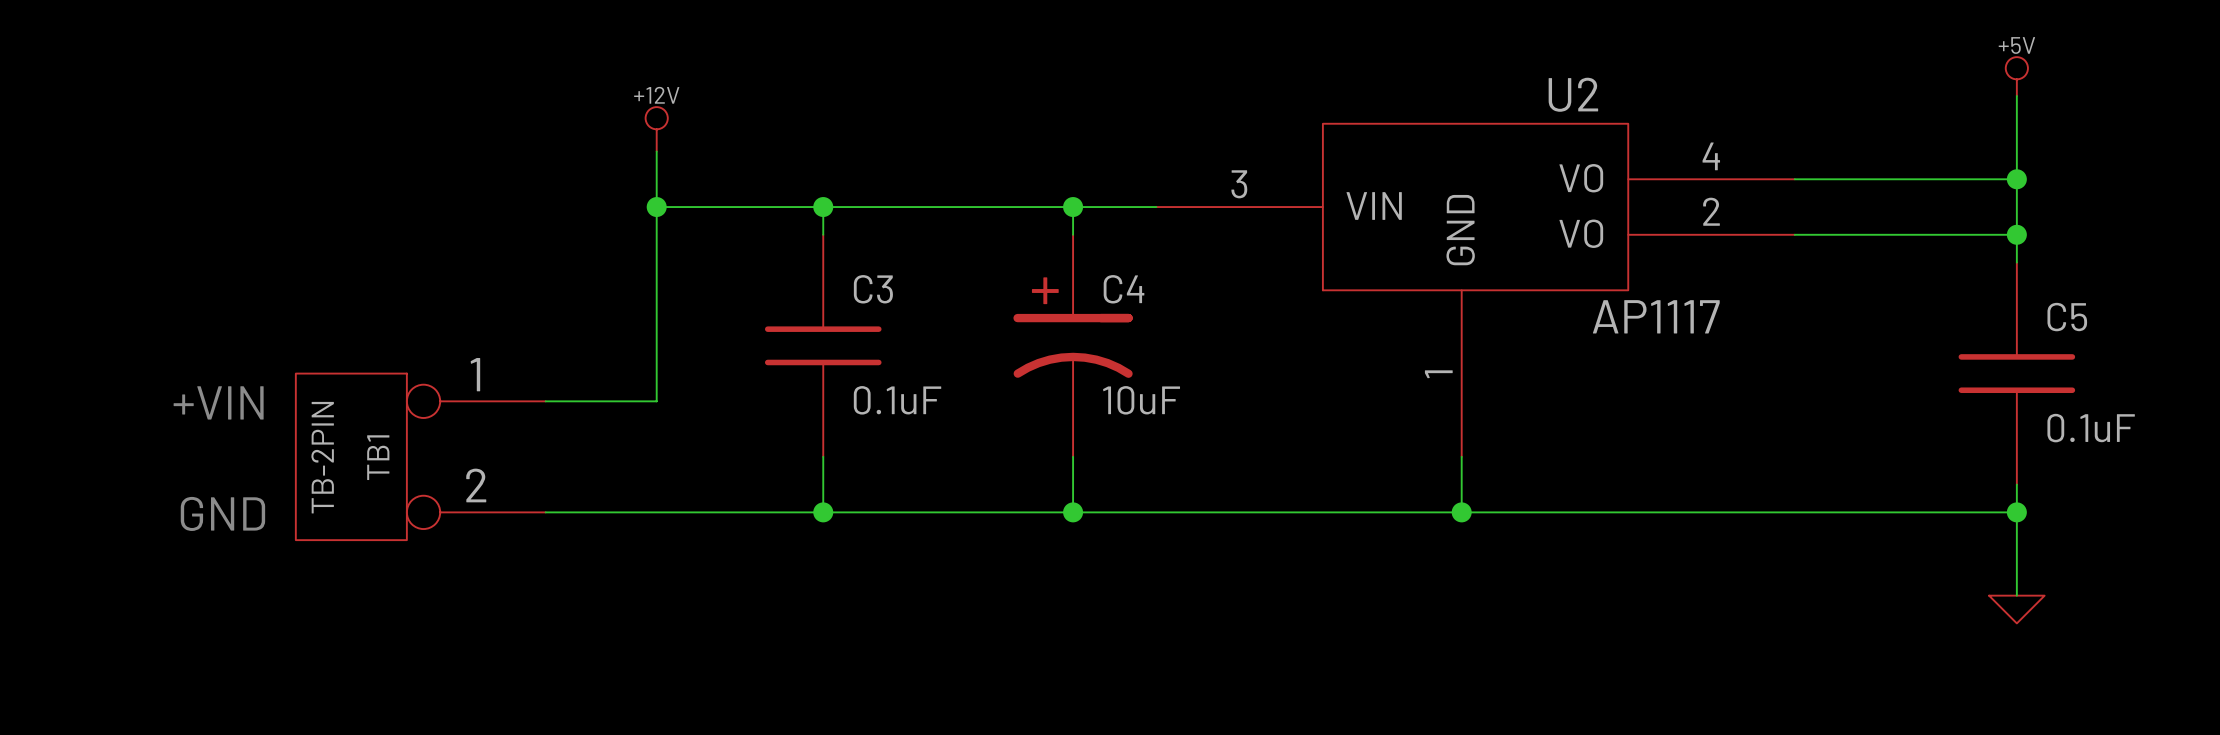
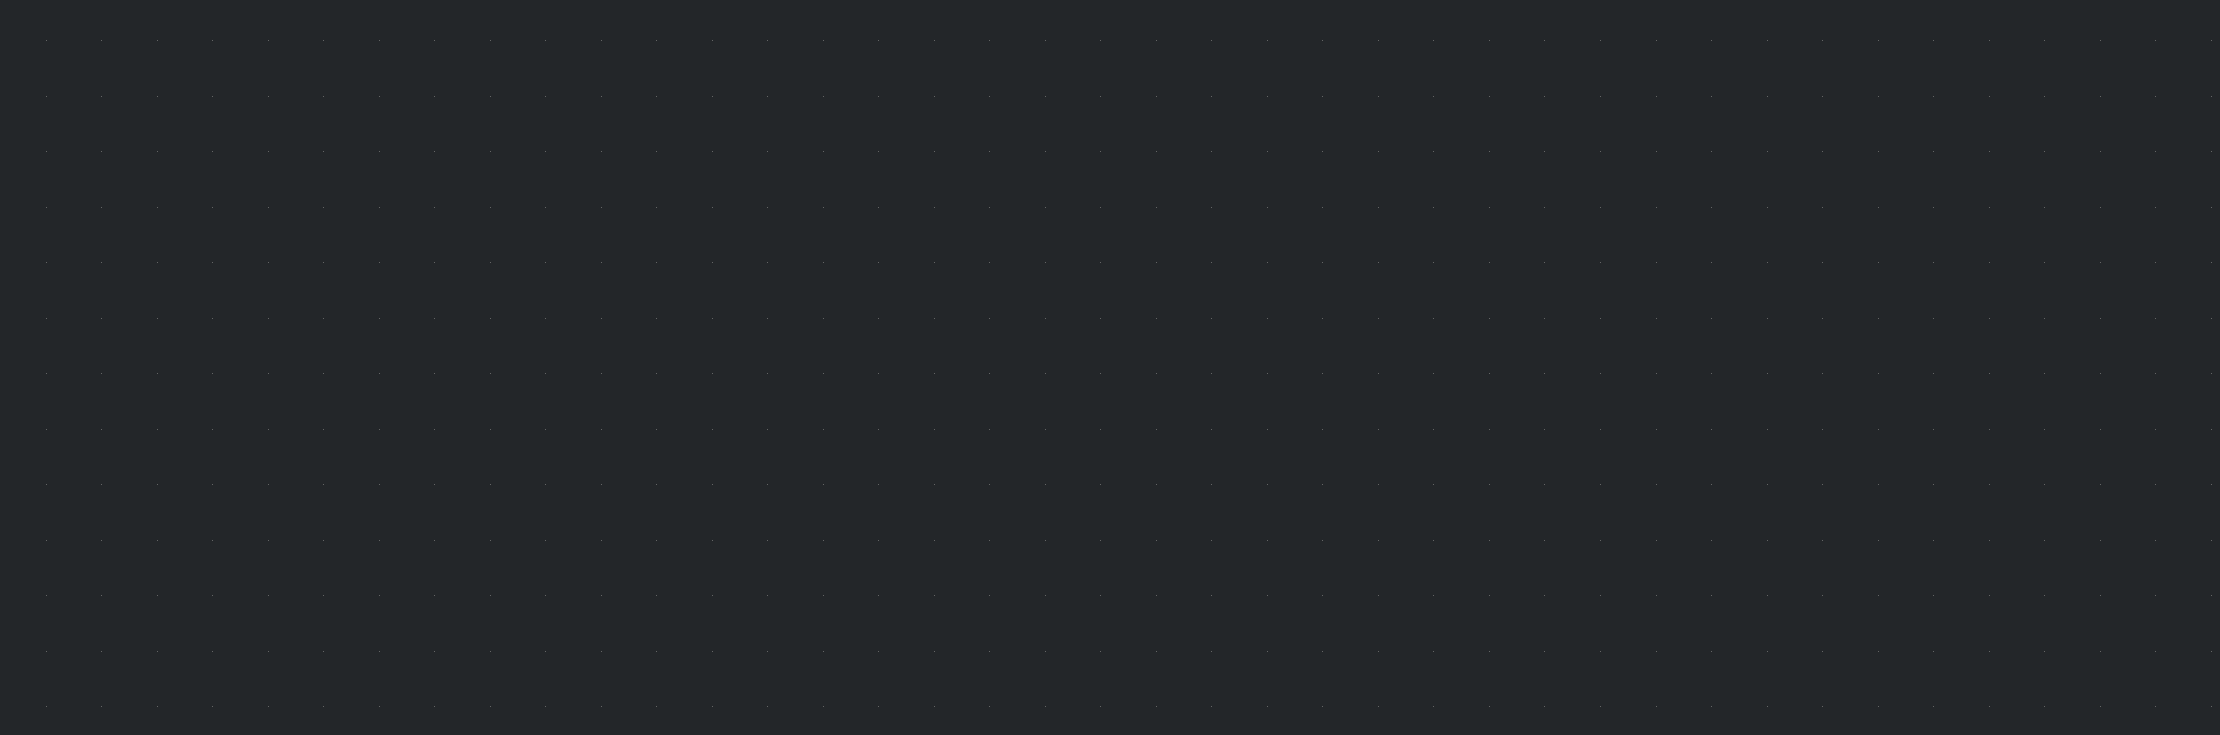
power symbol: +5V (2016, 76) -> none
wire: (2016, 96) (2016, 262) -> none
power symbol: +12V (656, 129) -> none
wire: (656, 151) (656, 401) (545, 401) -> none
wire: (1794, 179) (2016, 179) -> none
junction: (2016, 179) -> none
wire: (656, 207) (1156, 207) -> none
junction: (656, 207) -> none
wire: (823, 207) (823, 234) -> none
junction: (823, 207) -> none
wire: (1073, 207) (1073, 234) -> none
junction: (1073, 207) -> none
wire: (1794, 234) (2016, 234) -> none
junction: (2016, 234) -> none
U2: AP1117 (1475, 290) -> none
C3: 0.1uF (823, 345) -> none
C4: 10uF (1073, 345) -> none
C5: 0.1uF (2016, 373) -> none
text: +VIN (218, 402) -> none
TB1: TB-2PIN (420, 456) -> none
wire: (823, 456) (823, 512) -> none
wire: (1073, 456) (1073, 512) -> none
wire: (1461, 456) (1461, 512) -> none
wire: (2016, 484) (2016, 595) -> none
wire: (545, 512) (2016, 512) -> none
junction: (823, 512) -> none
junction: (1073, 512) -> none
junction: (1461, 512) -> none
junction: (2016, 512) -> none
text: GND (222, 513) -> none
power symbol: (2016, 609) -> none

